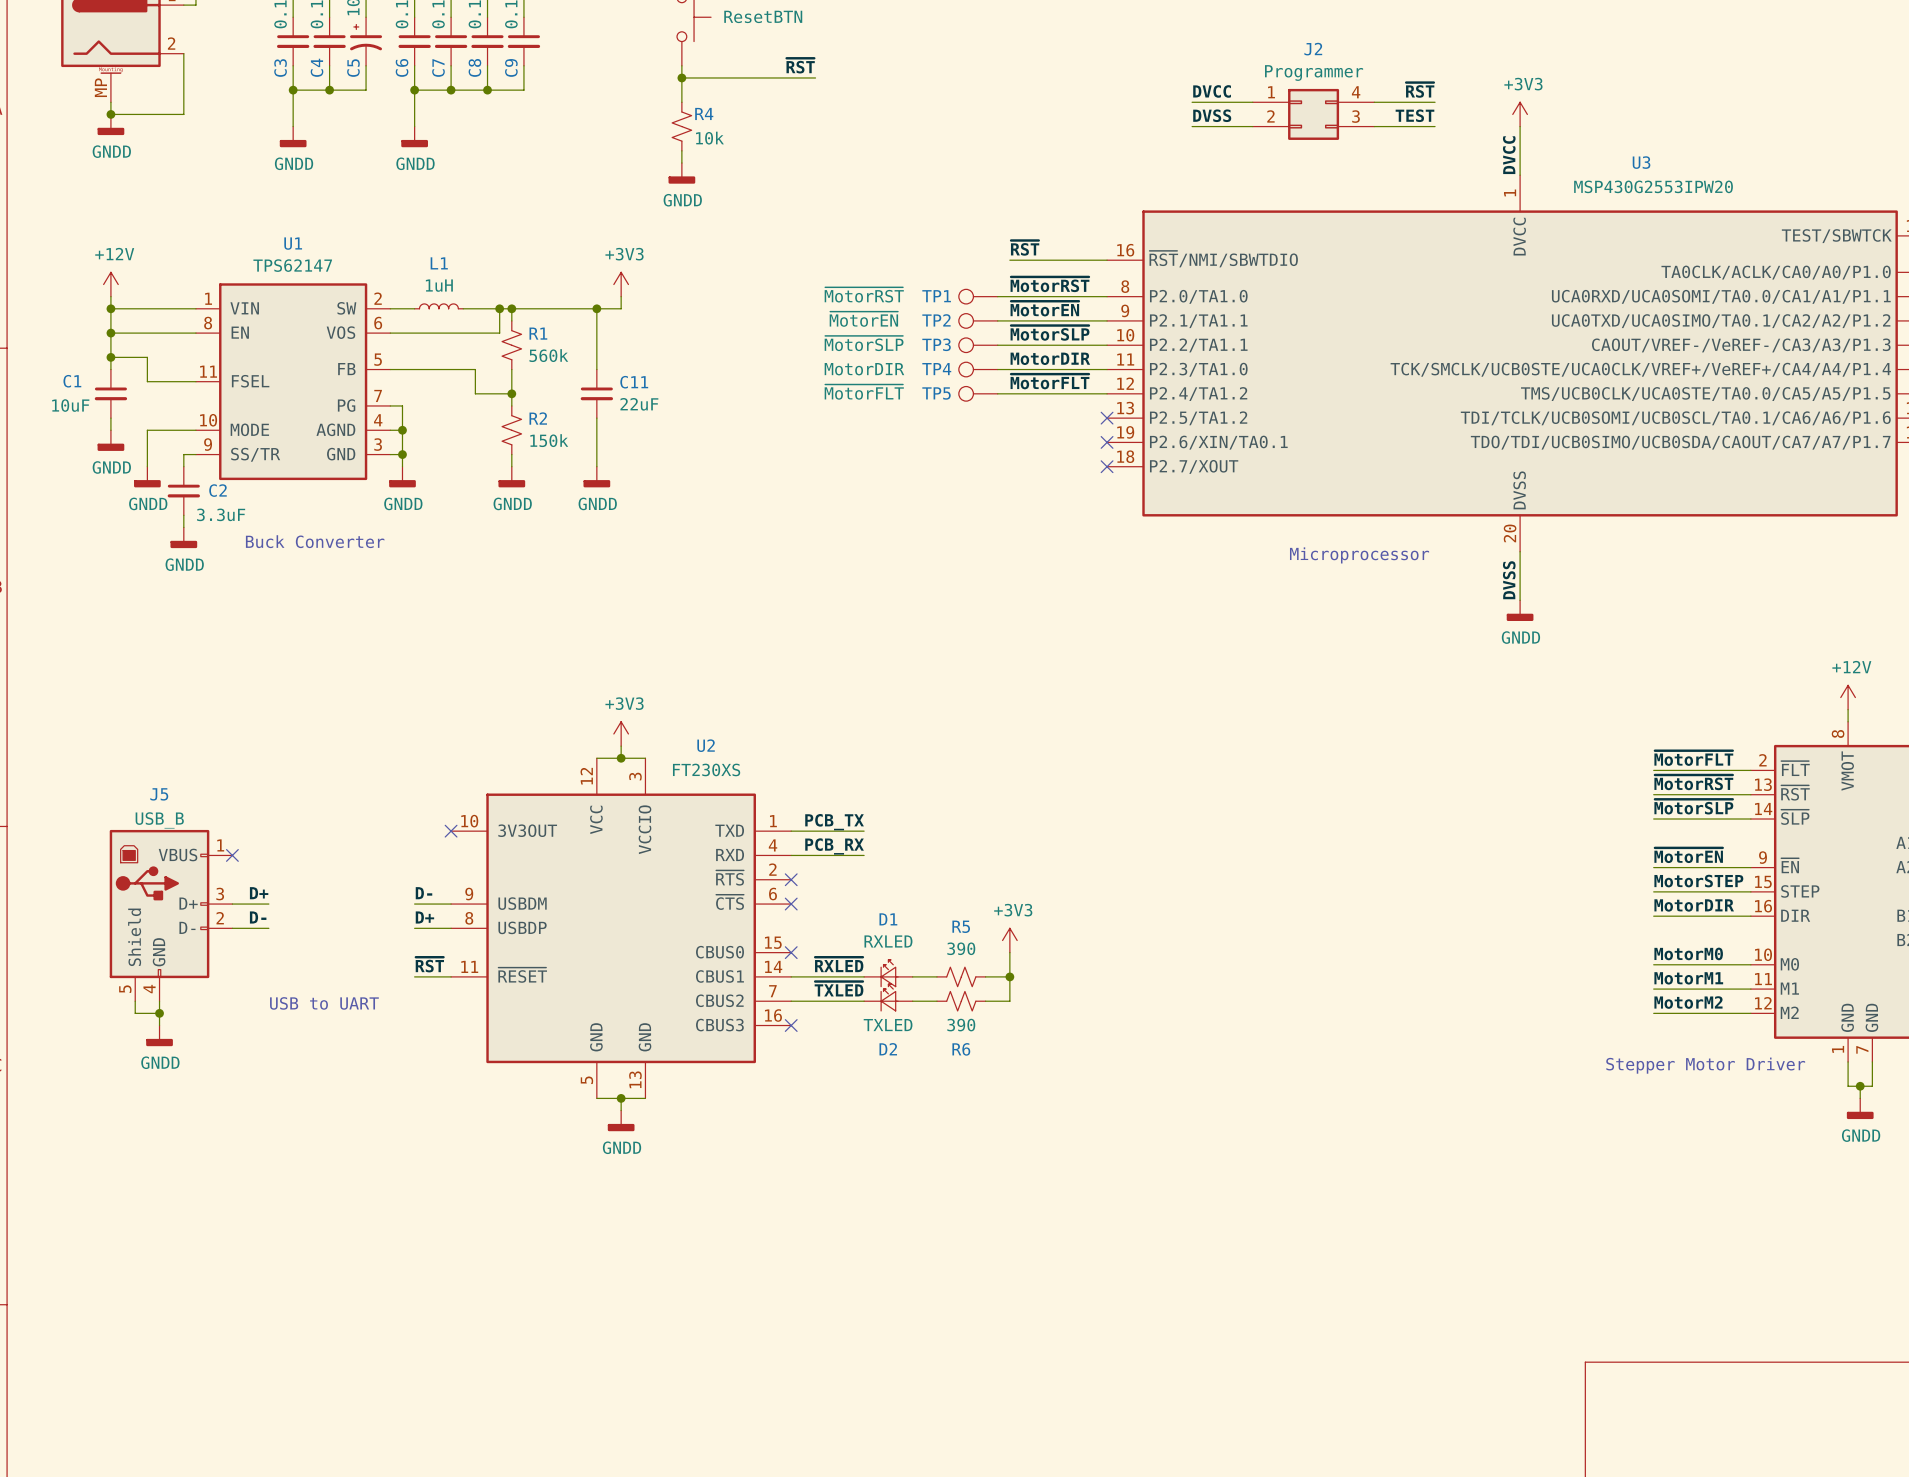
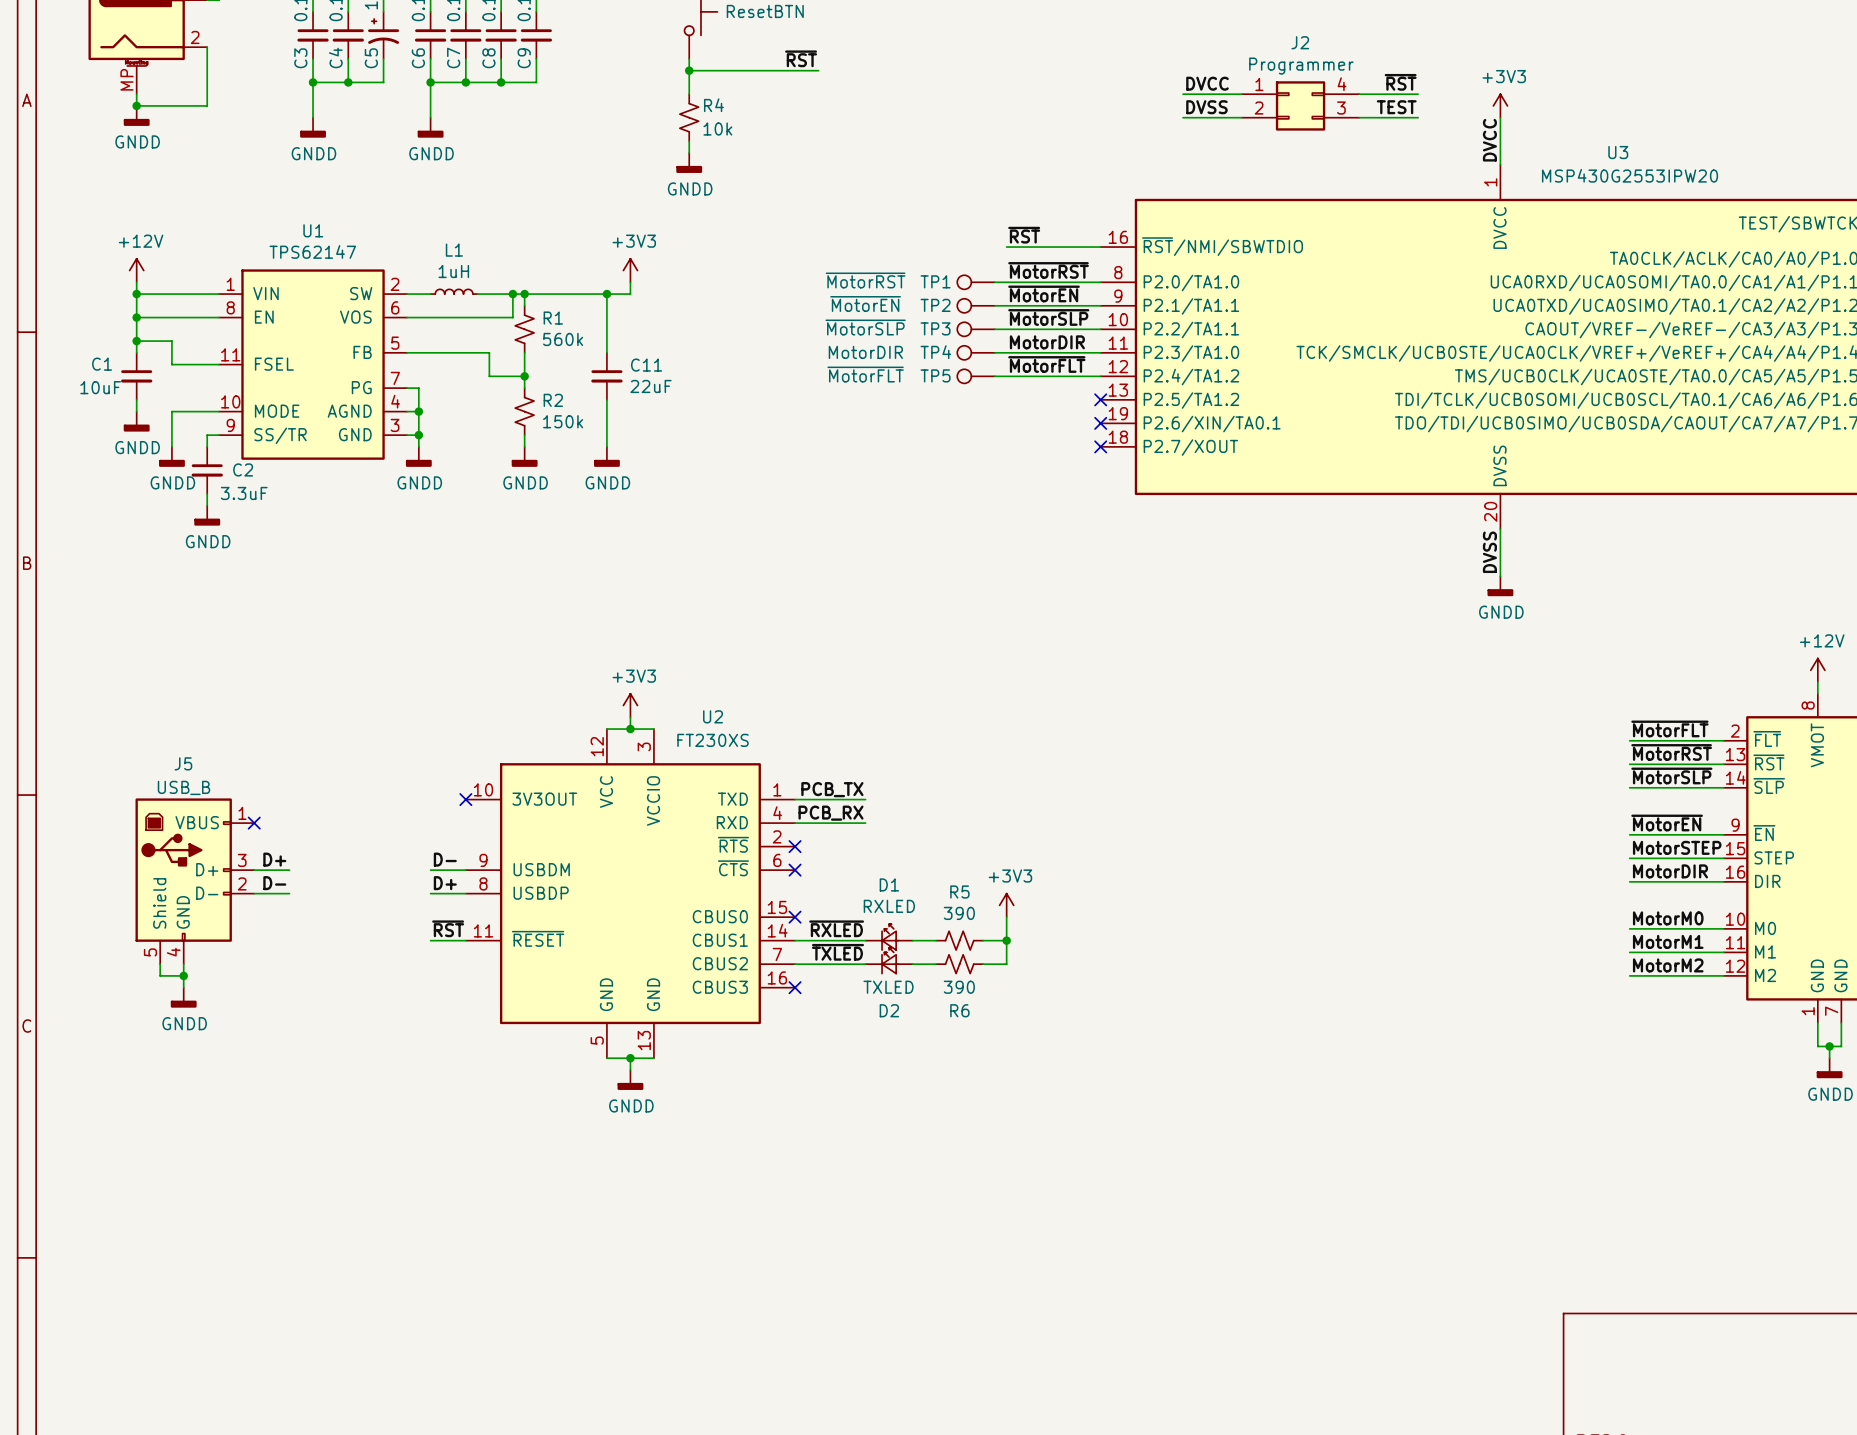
text: Buck Converter (315, 541) -> none
text: Microprocessor (1359, 555) -> none
text: USB to UART (324, 1003) -> none
text: Stepper Motor Driver (1705, 1065) -> none

